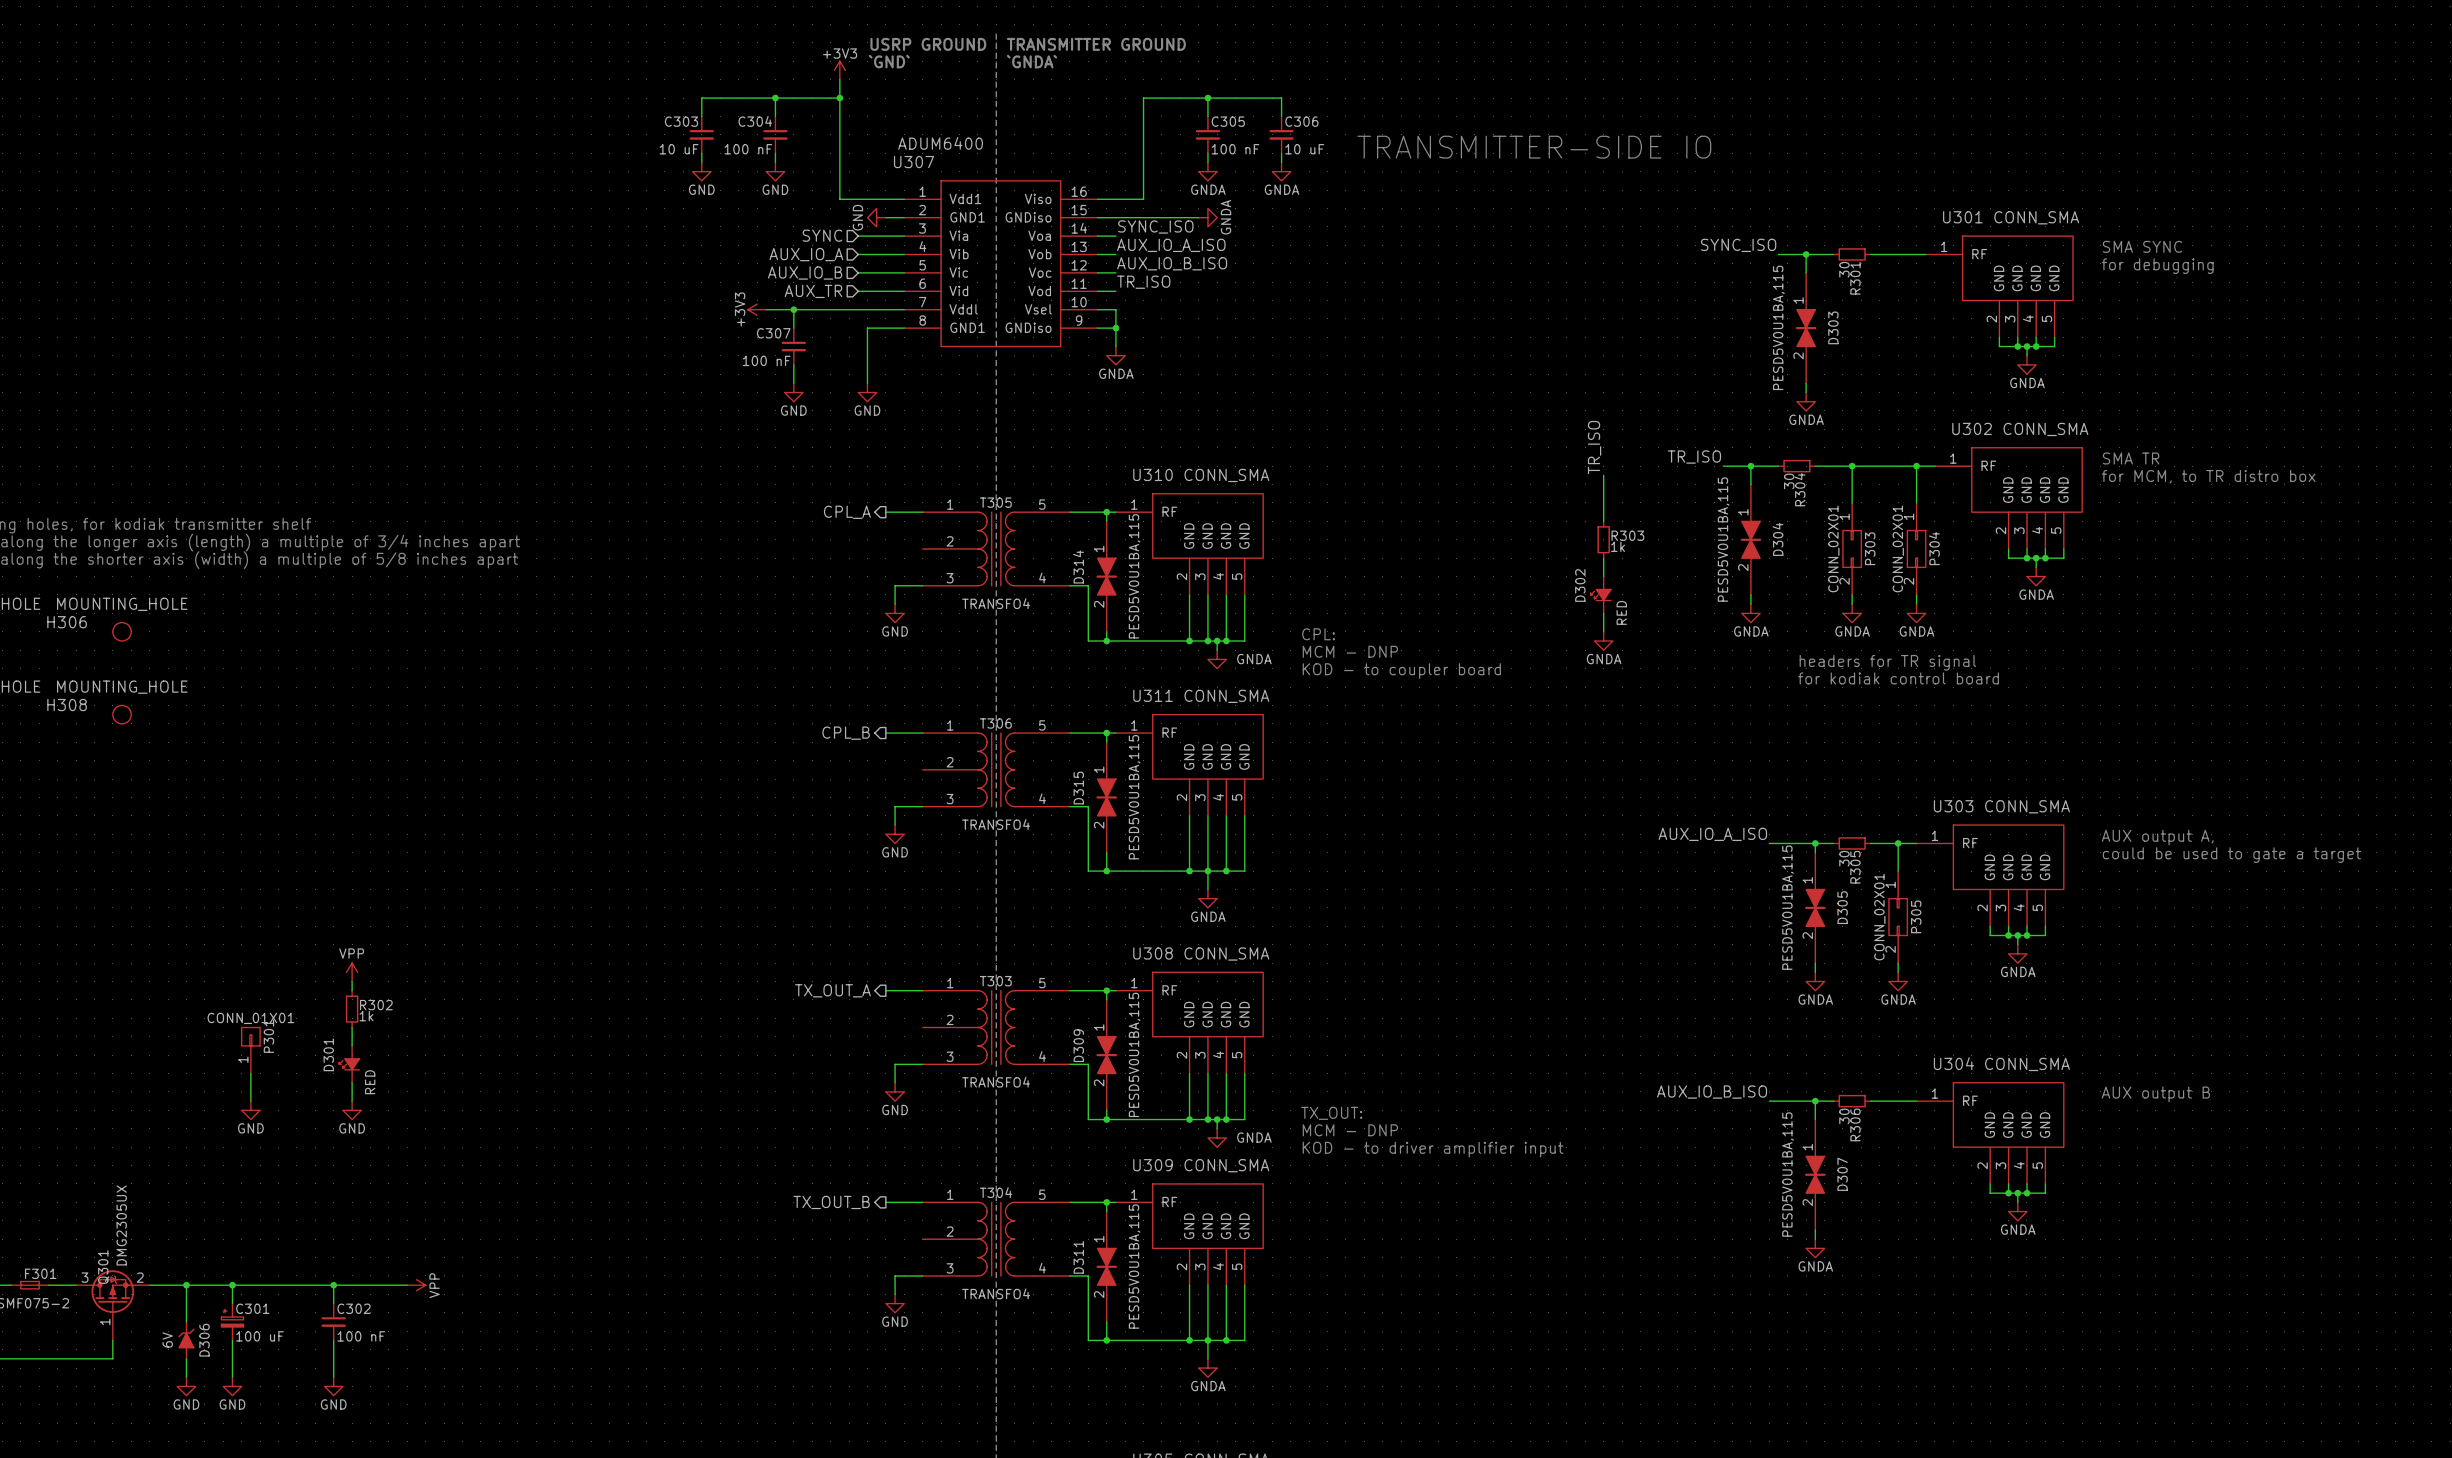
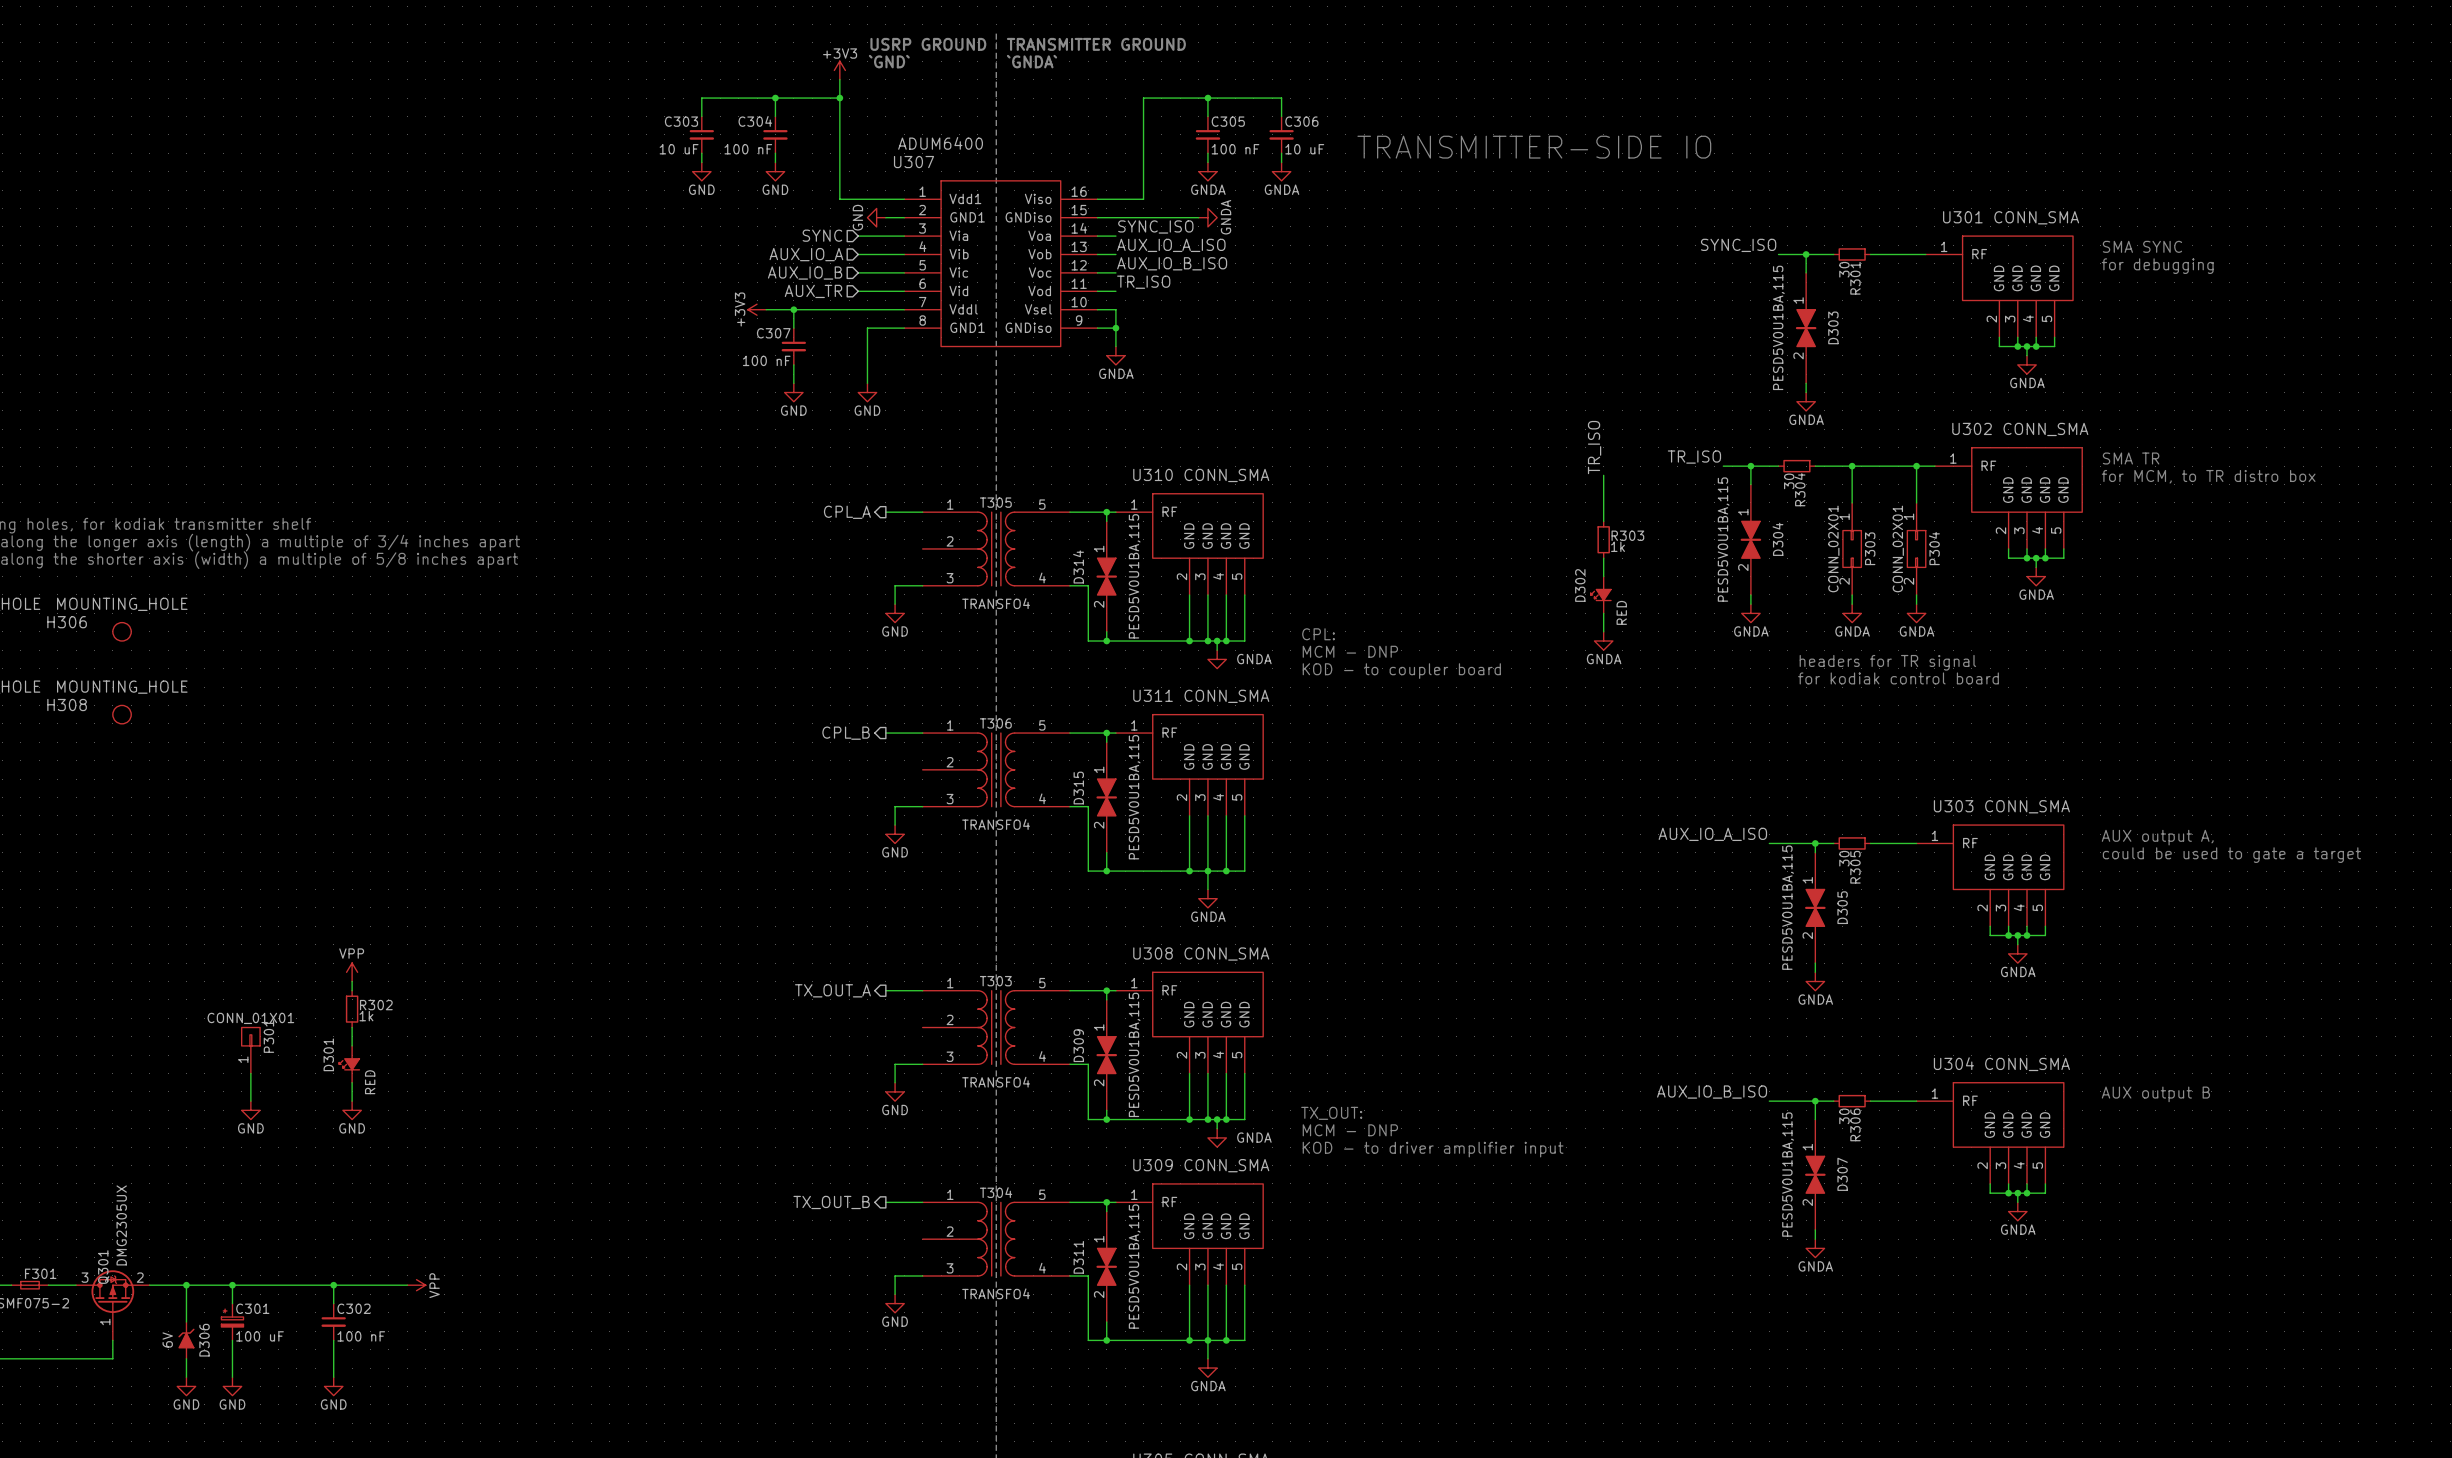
wire: (1898, 843) (1898, 871) -> none
junction: (1898, 843) -> none
P305: CONN_02X01 (1898, 917) -> none
wire: (1898, 963) (1898, 972) -> none
power symbol: GNDA (1898, 981) -> none

